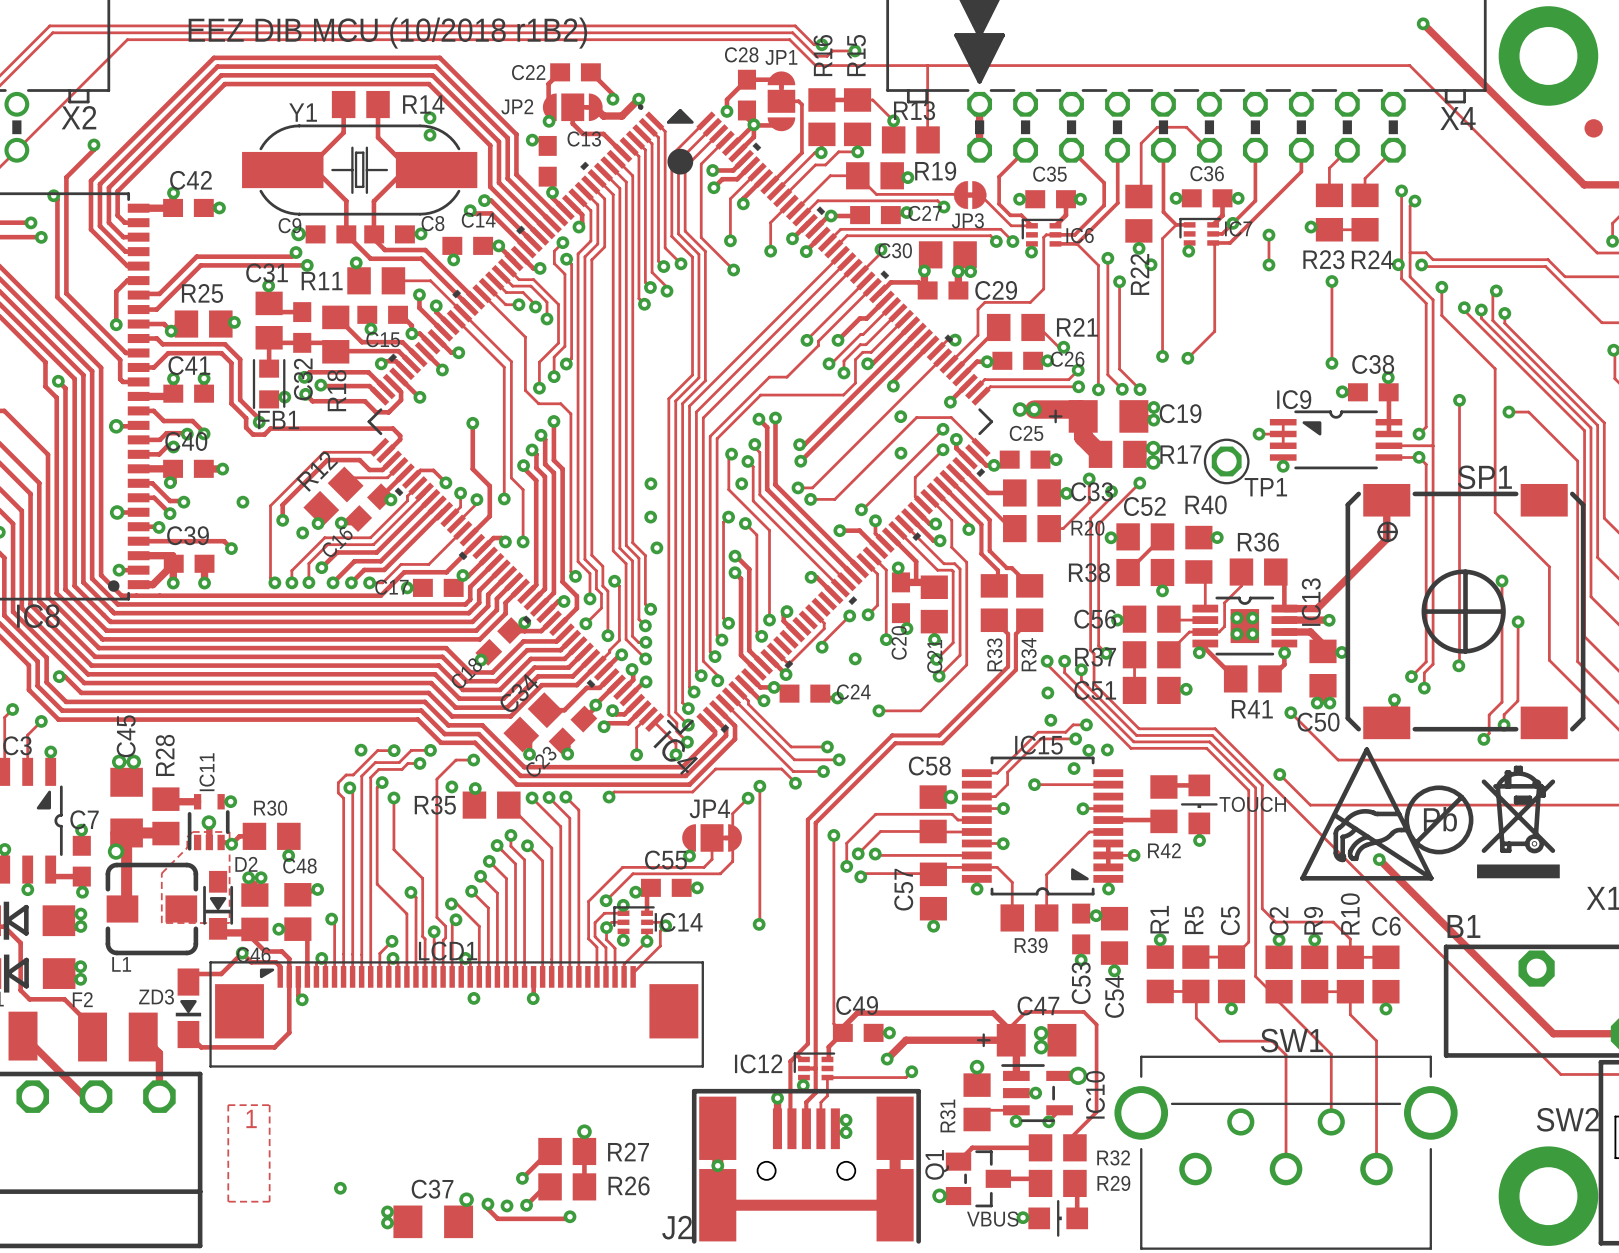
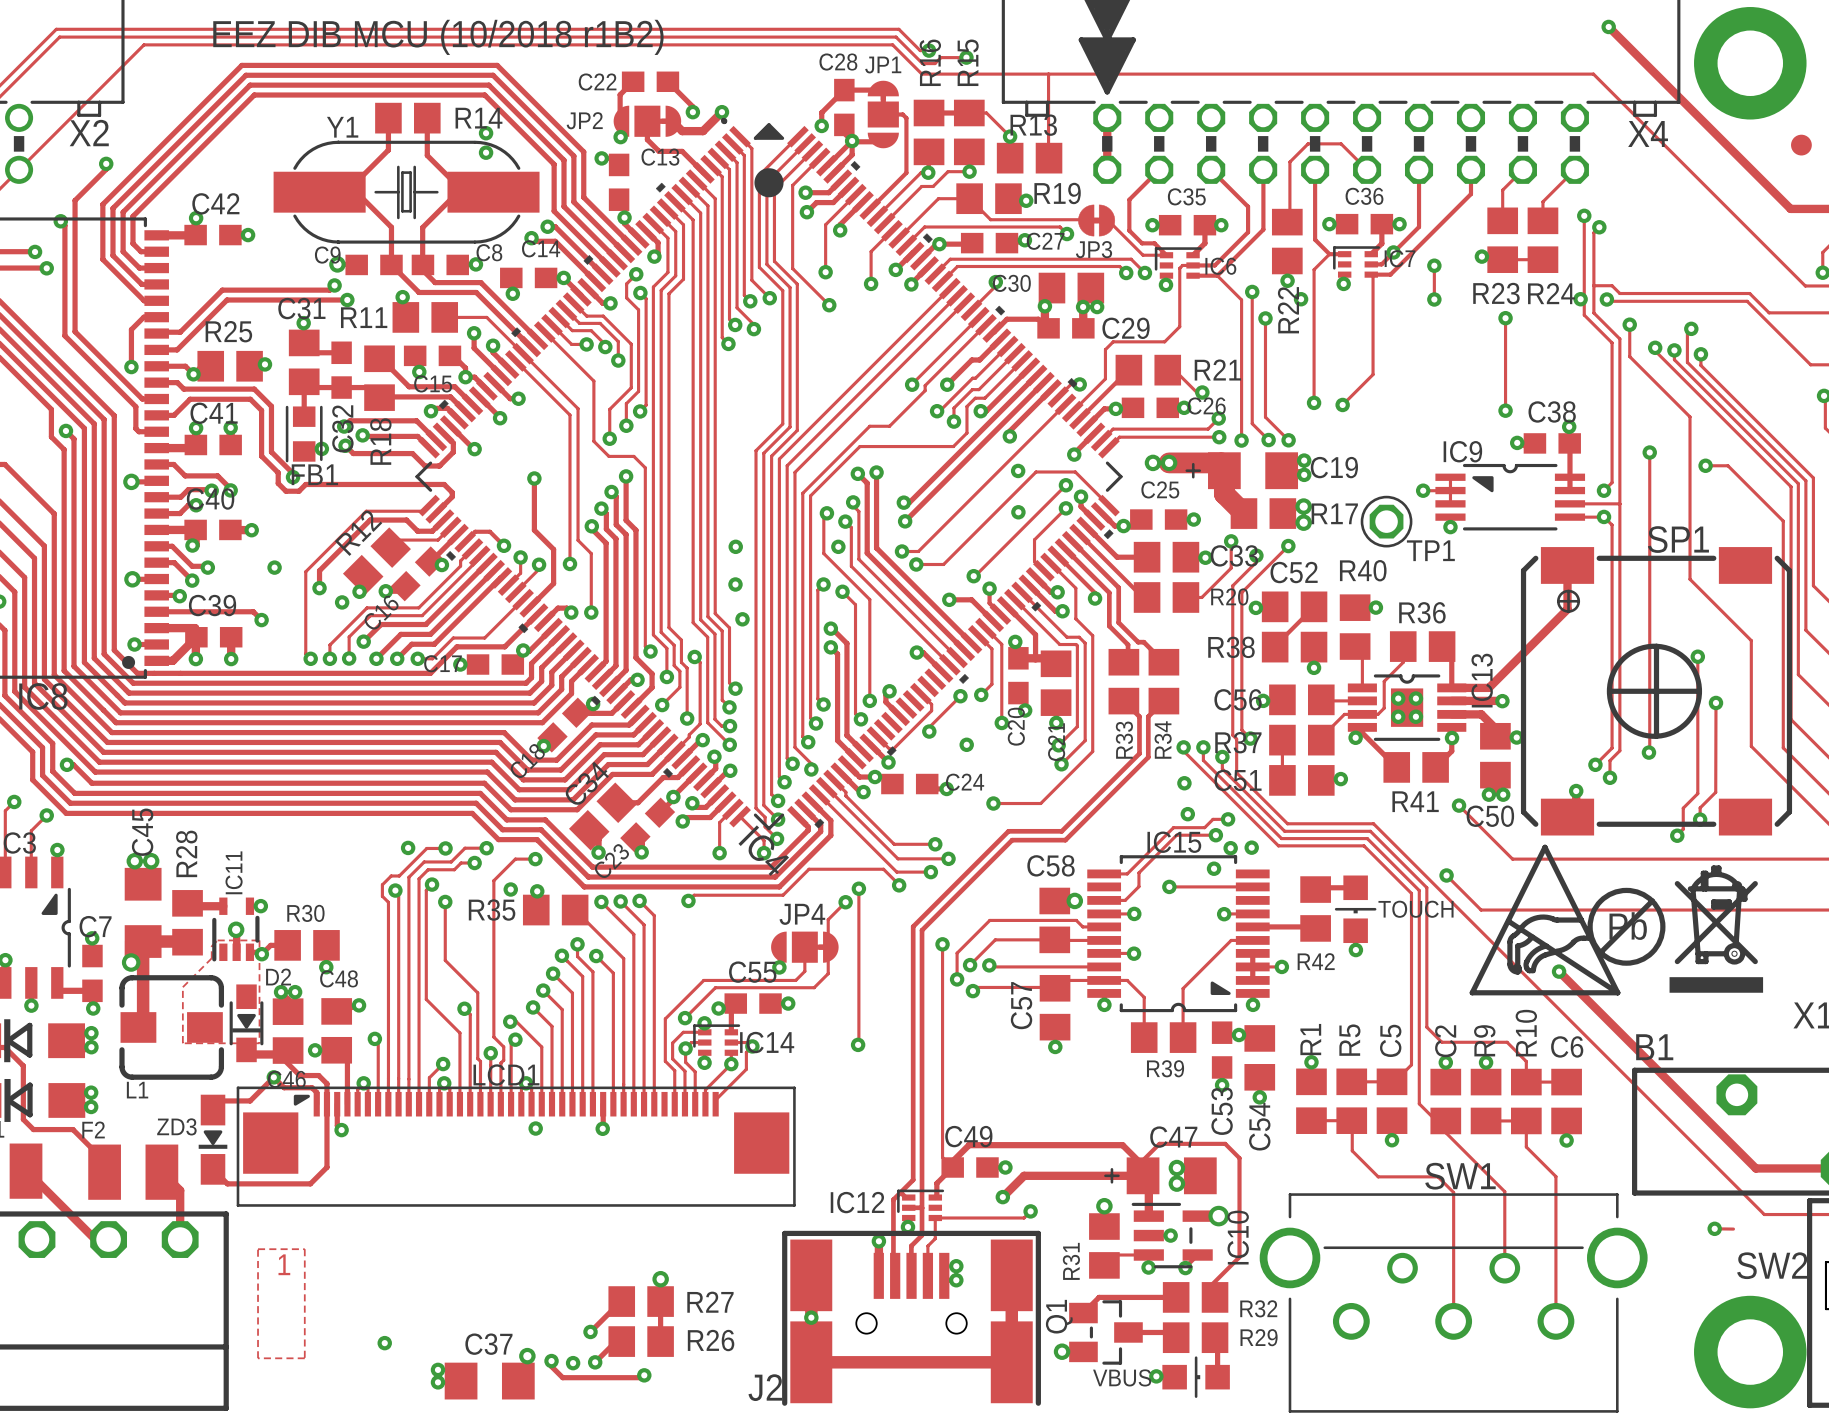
track: none -> (1714, 1228) (1733, 1229)
via: none -> (1714, 1228)

